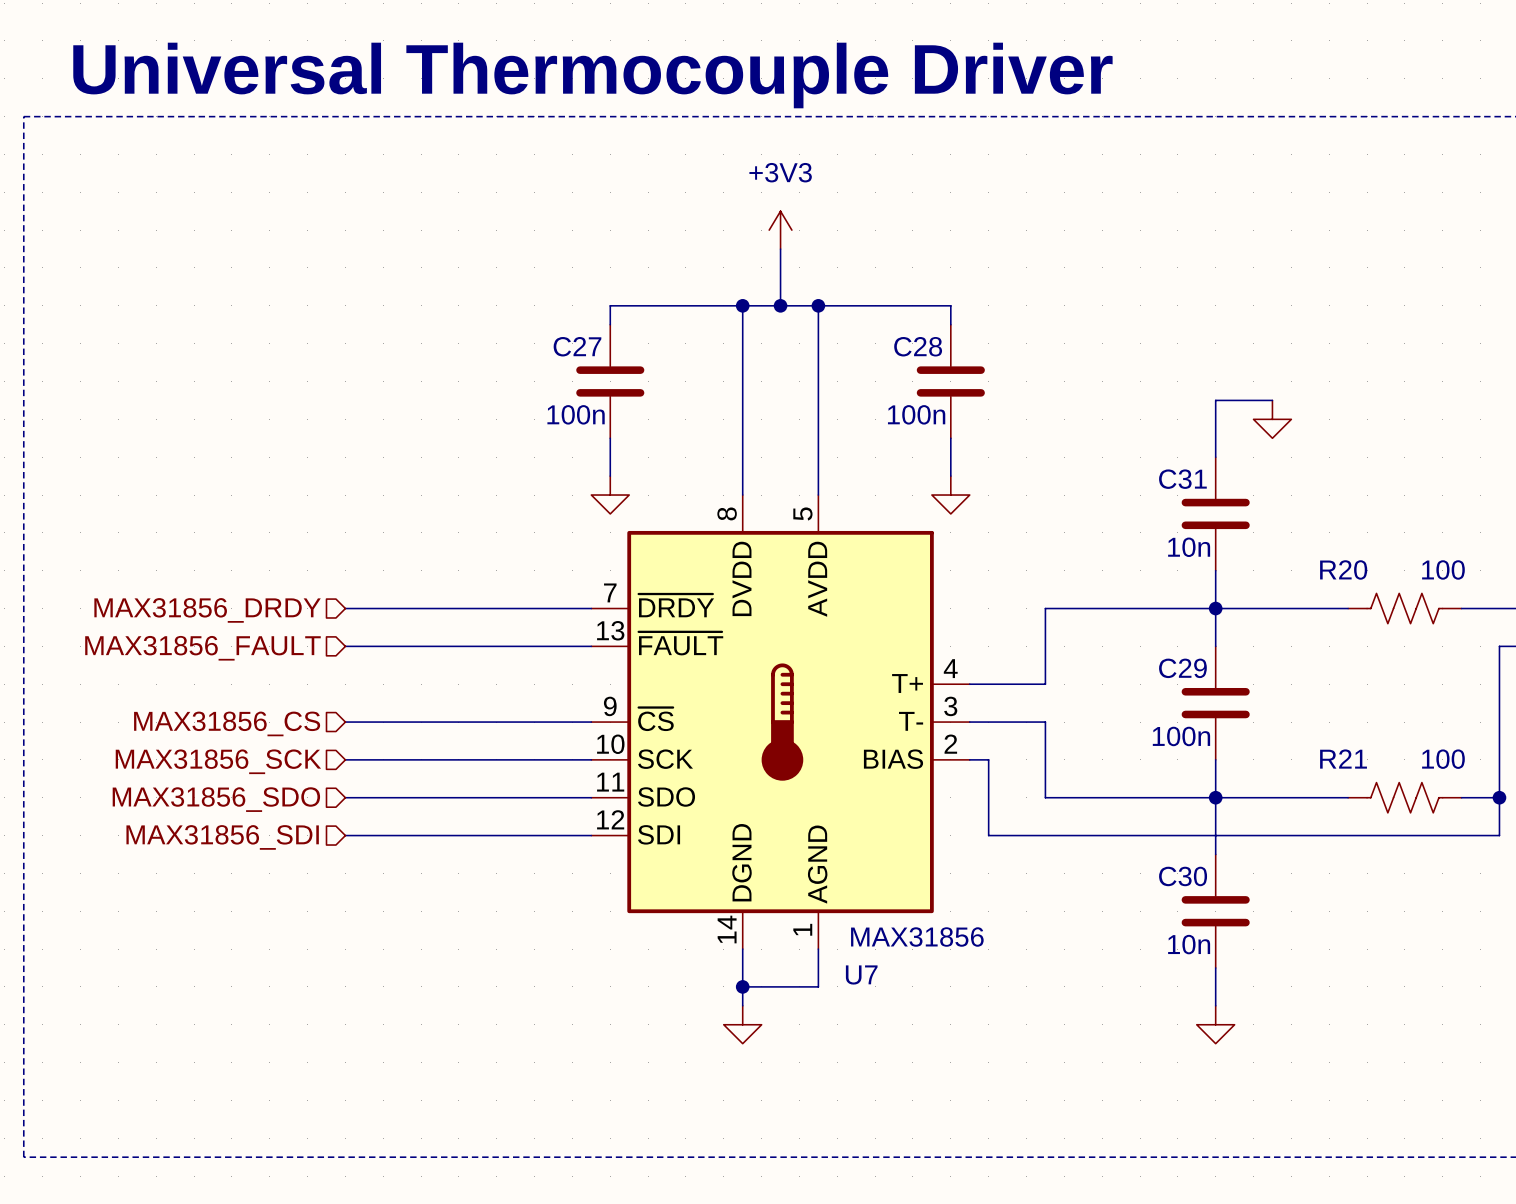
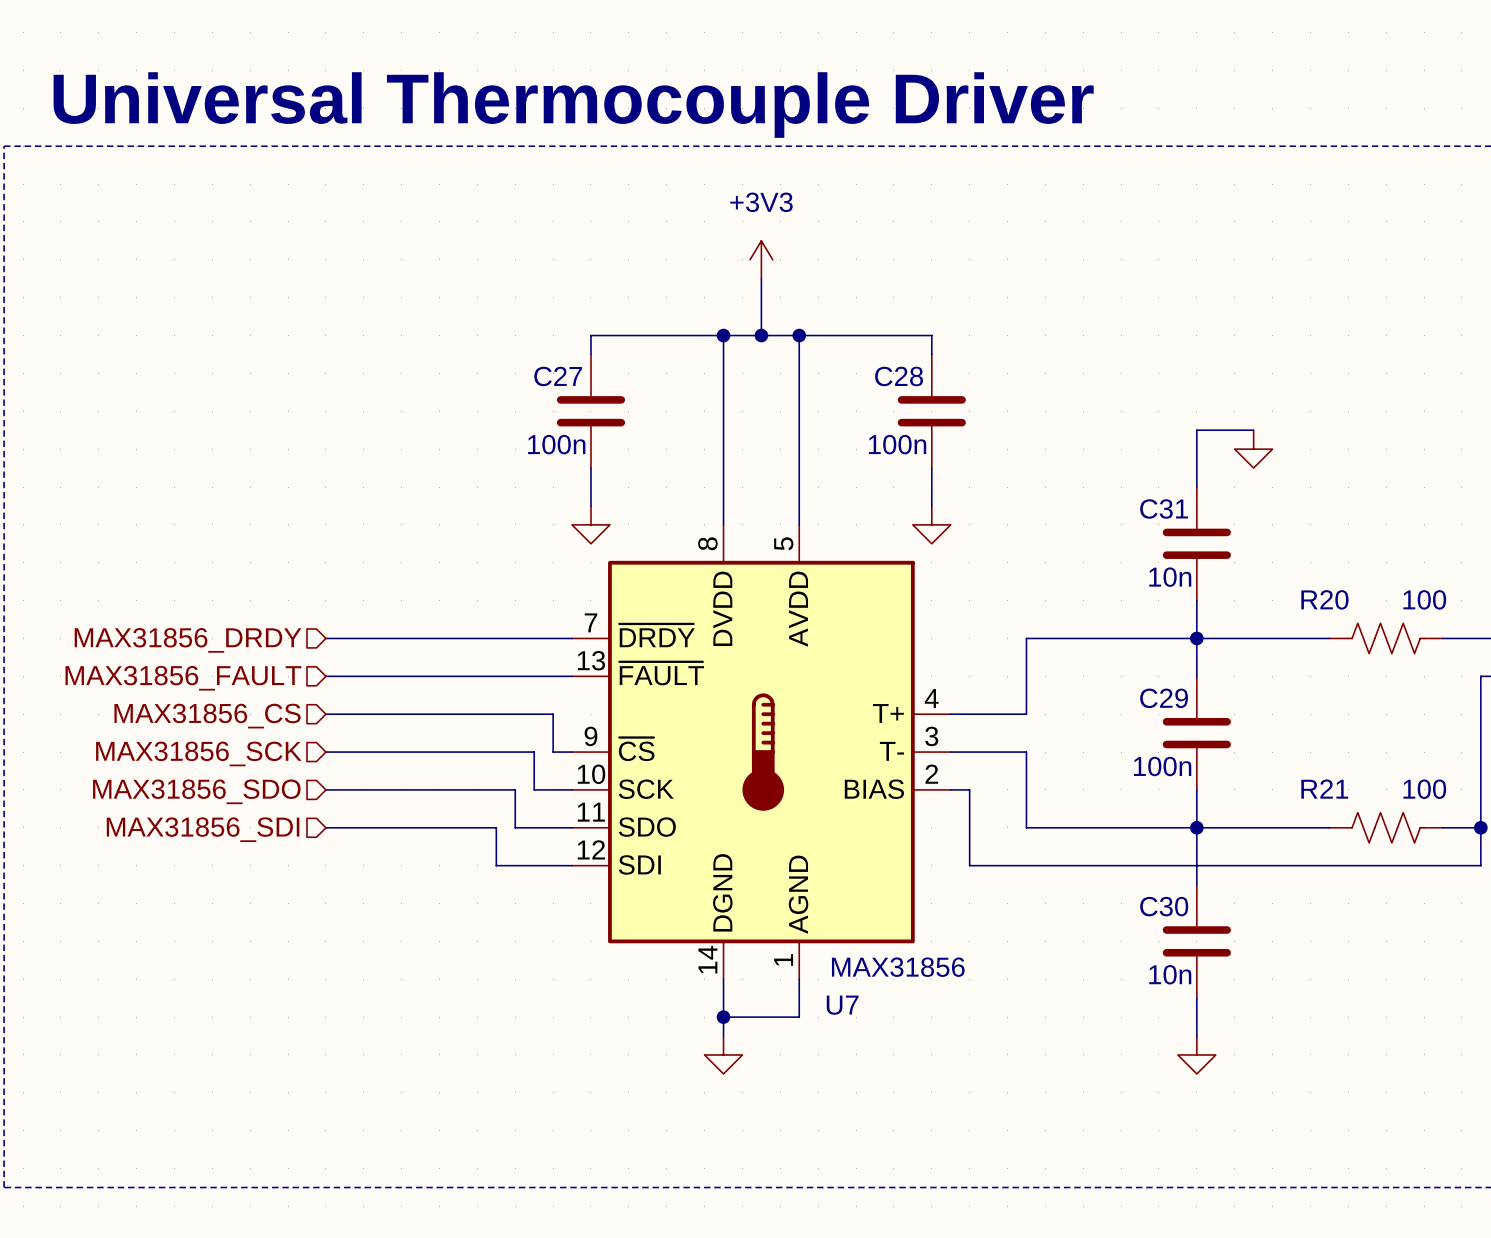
wire: none -> (325, 714) (553, 714) (553, 752)
hierarchical label: none -> MAX31856_CS (207, 716)
wire: (553, 722) (572, 722) -> (534, 752) (534, 789)
hierarchical label: MAX31856_CS (227, 723) -> MAX31856_SCK (198, 753)
wire: (534, 759) (553, 759) -> (515, 789) (515, 827)
hierarchical label: MAX31856_SCK (218, 761) -> MAX31856_SDO (196, 791)
wire: (515, 797) (534, 797) -> (496, 827) (496, 865)
hierarchical label: MAX31856_SDO (216, 799) -> MAX31856_SDI (203, 829)
wire: (345, 835) (515, 835) -> none
hierarchical label: MAX31856_SDI (222, 837) -> none

